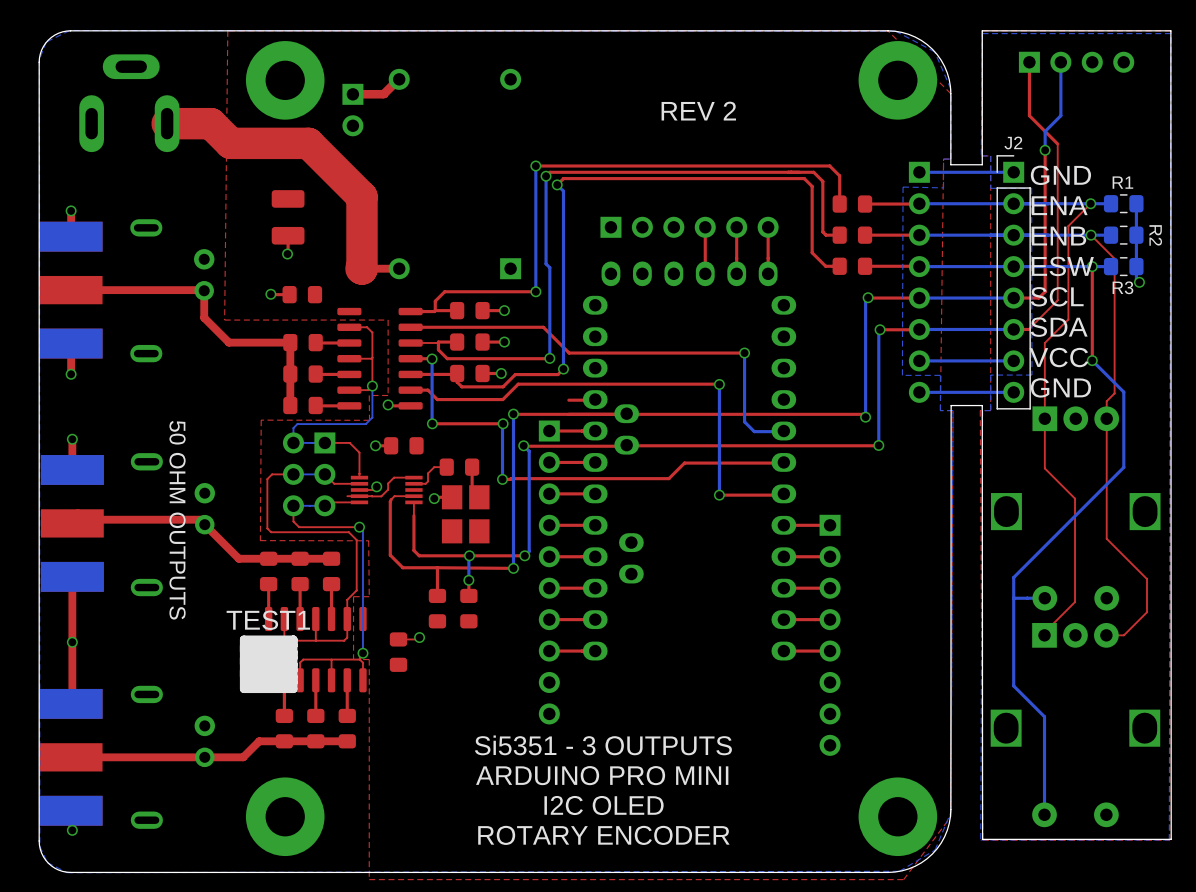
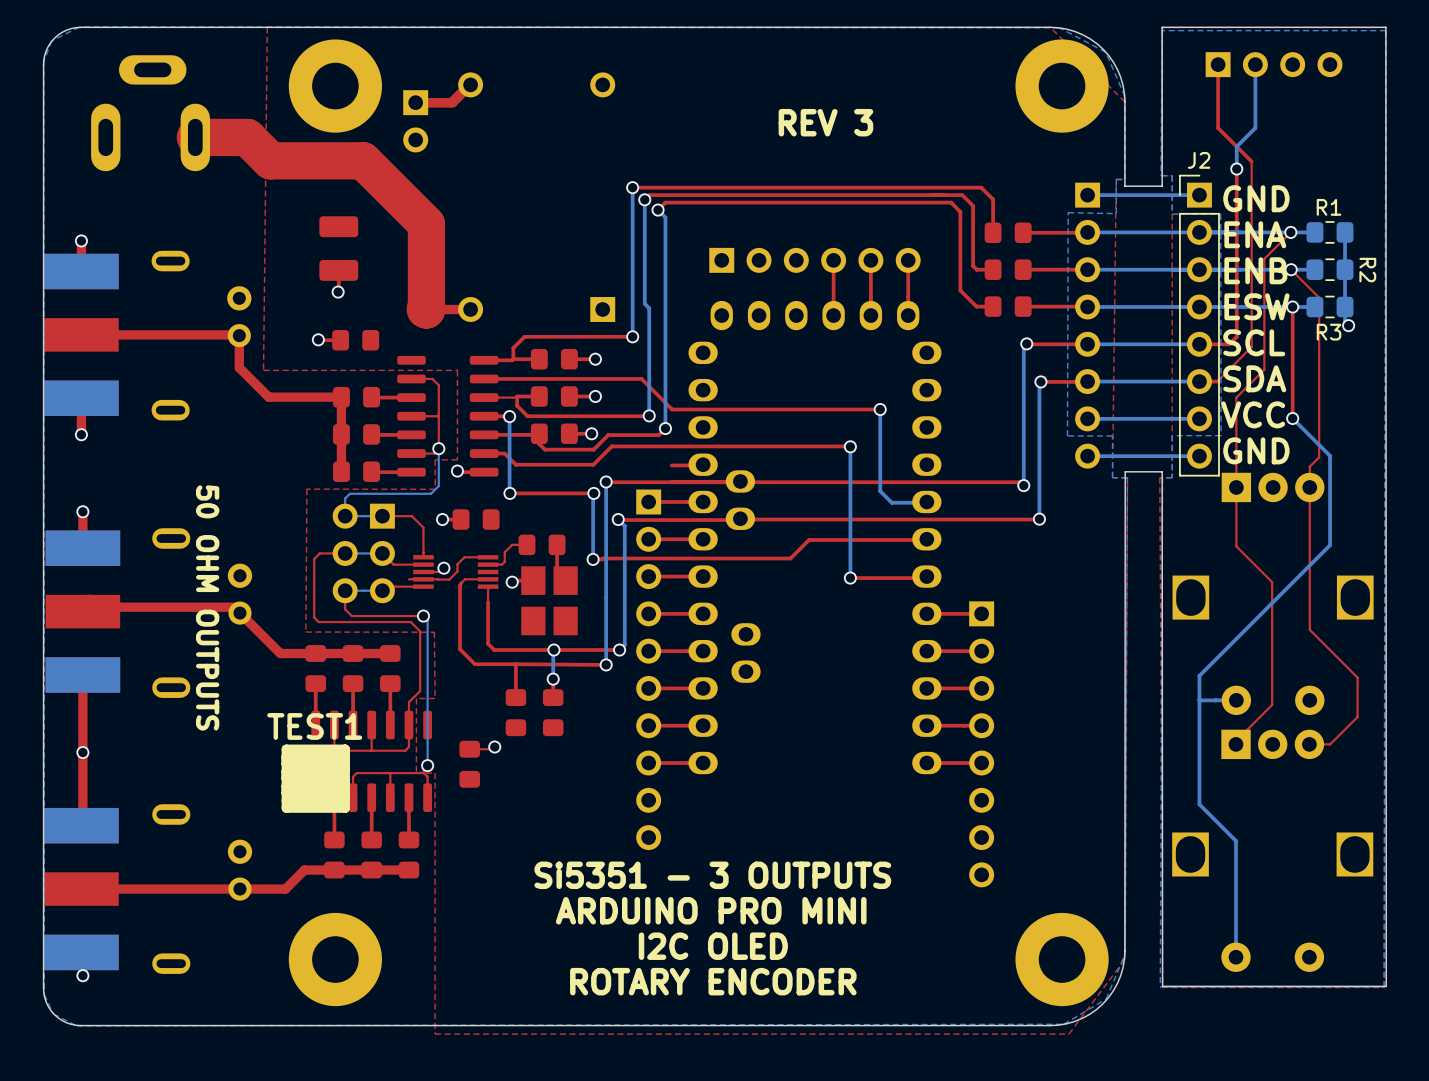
text: REV 2 (698, 111) -> REV 3 (825, 122)

